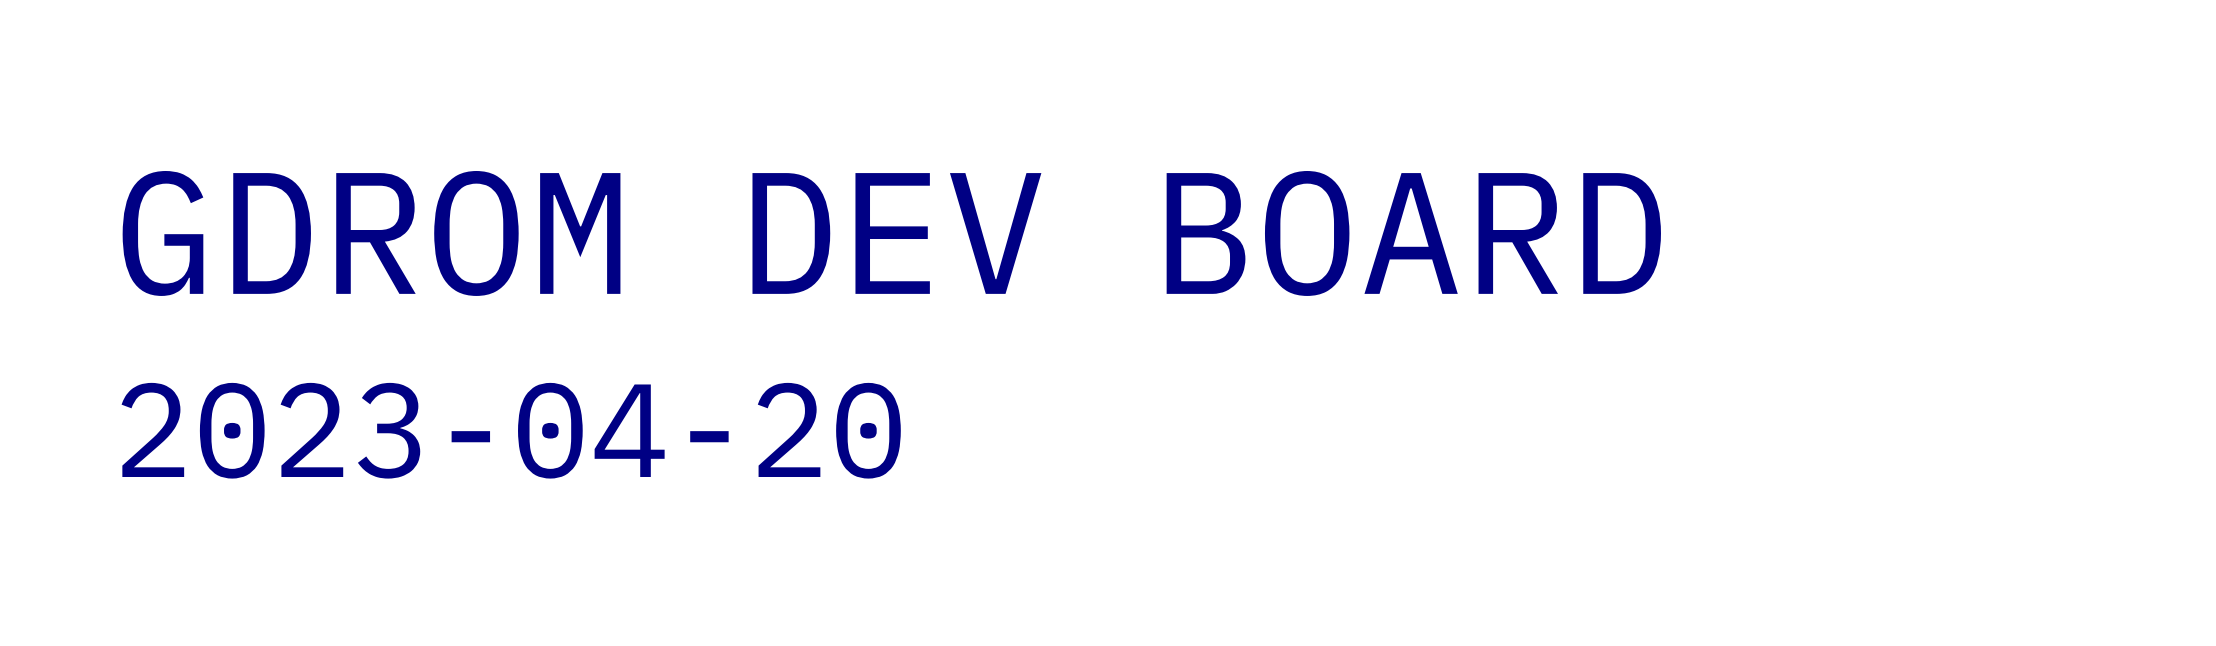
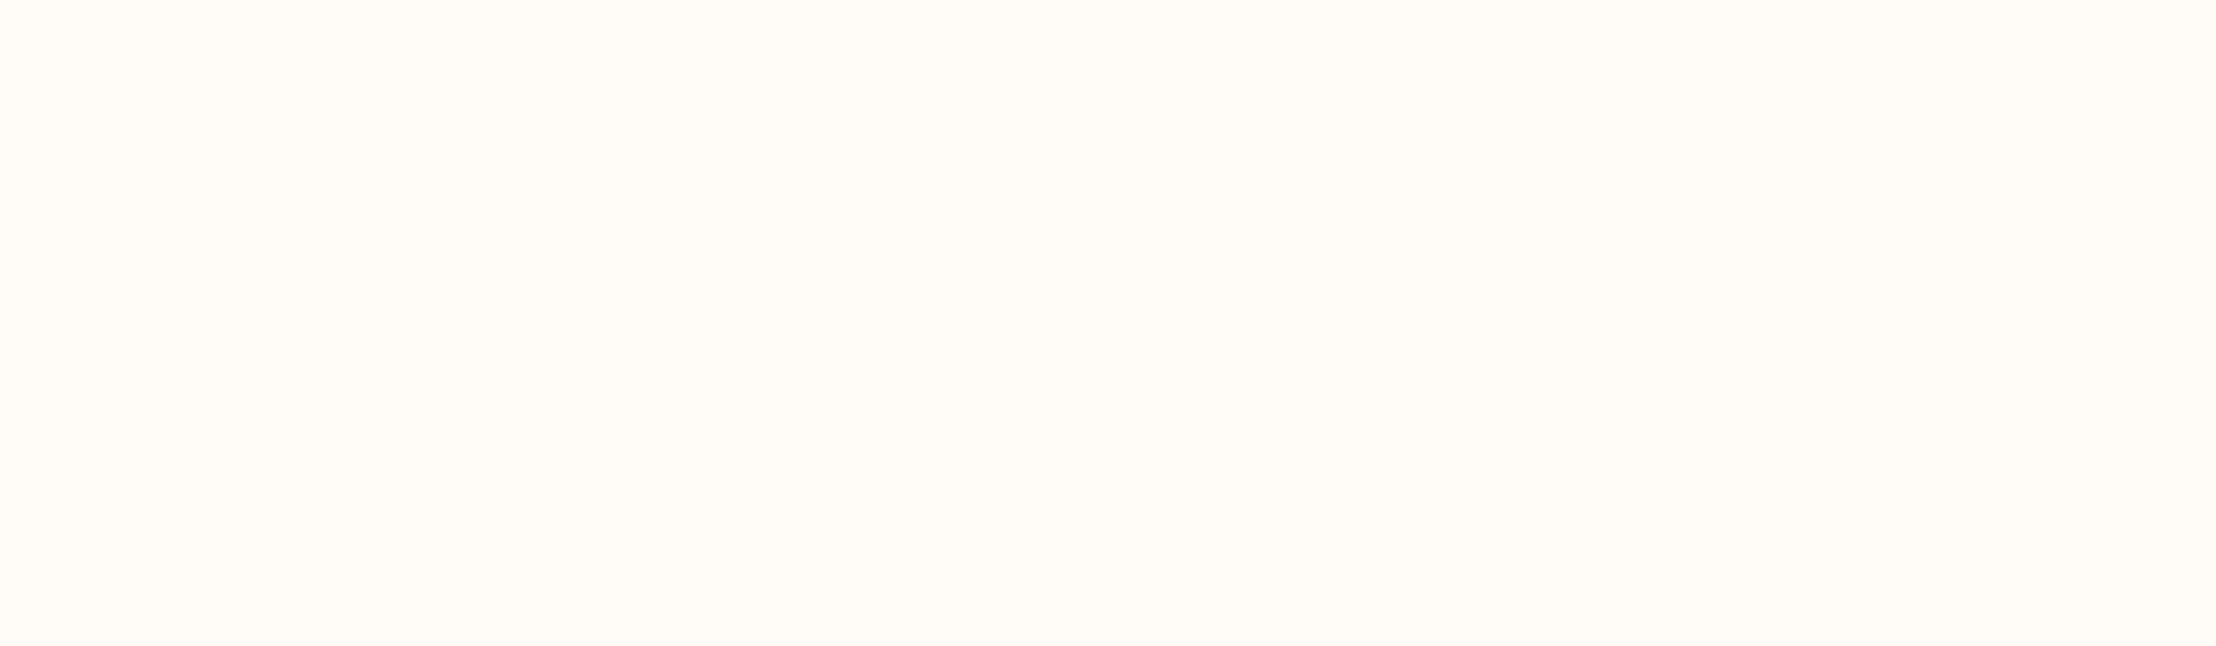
text: GDROM DEV BOARD (891, 233) -> none
text: 2023-04-20 (511, 430) -> none

